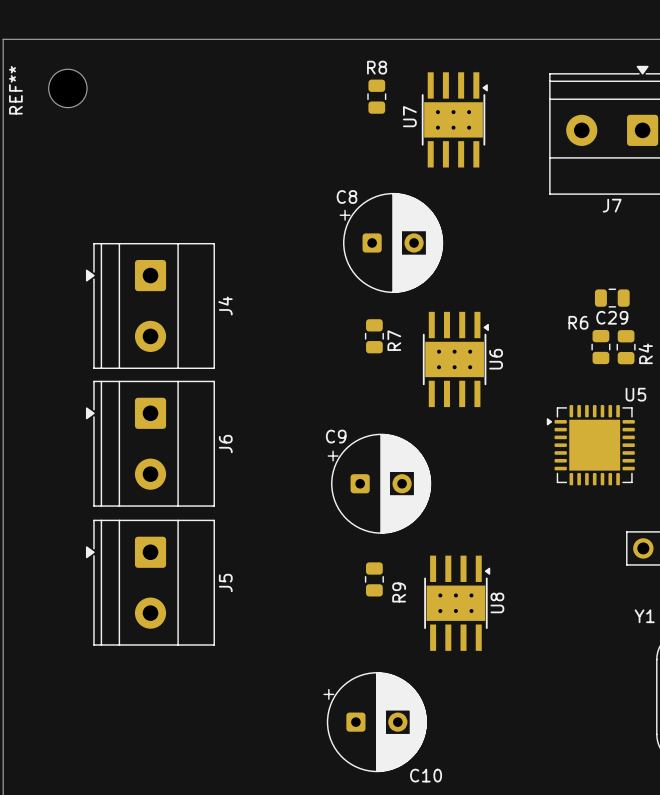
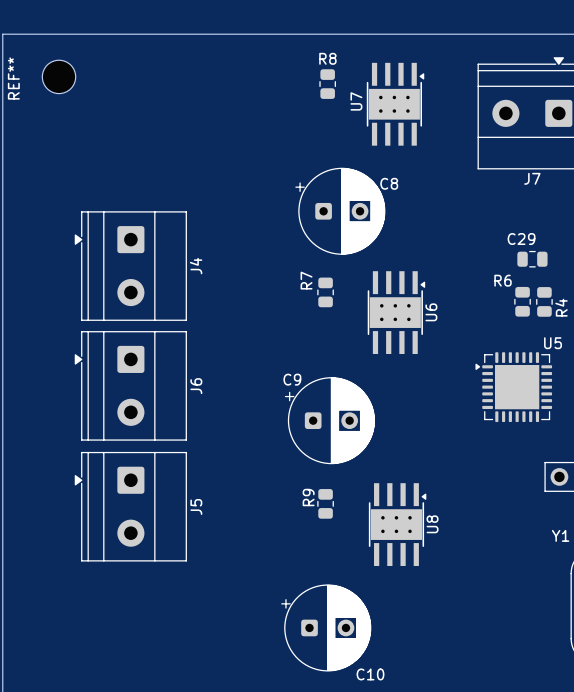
C8 name position: C8 (346, 197) -> C8 (389, 183)
C29 name position: C29 (612, 317) -> C29 (521, 239)
R7 name position: R7 (394, 340) -> R7 (306, 280)
R9 name position: R9 (399, 592) -> R9 (308, 497)

